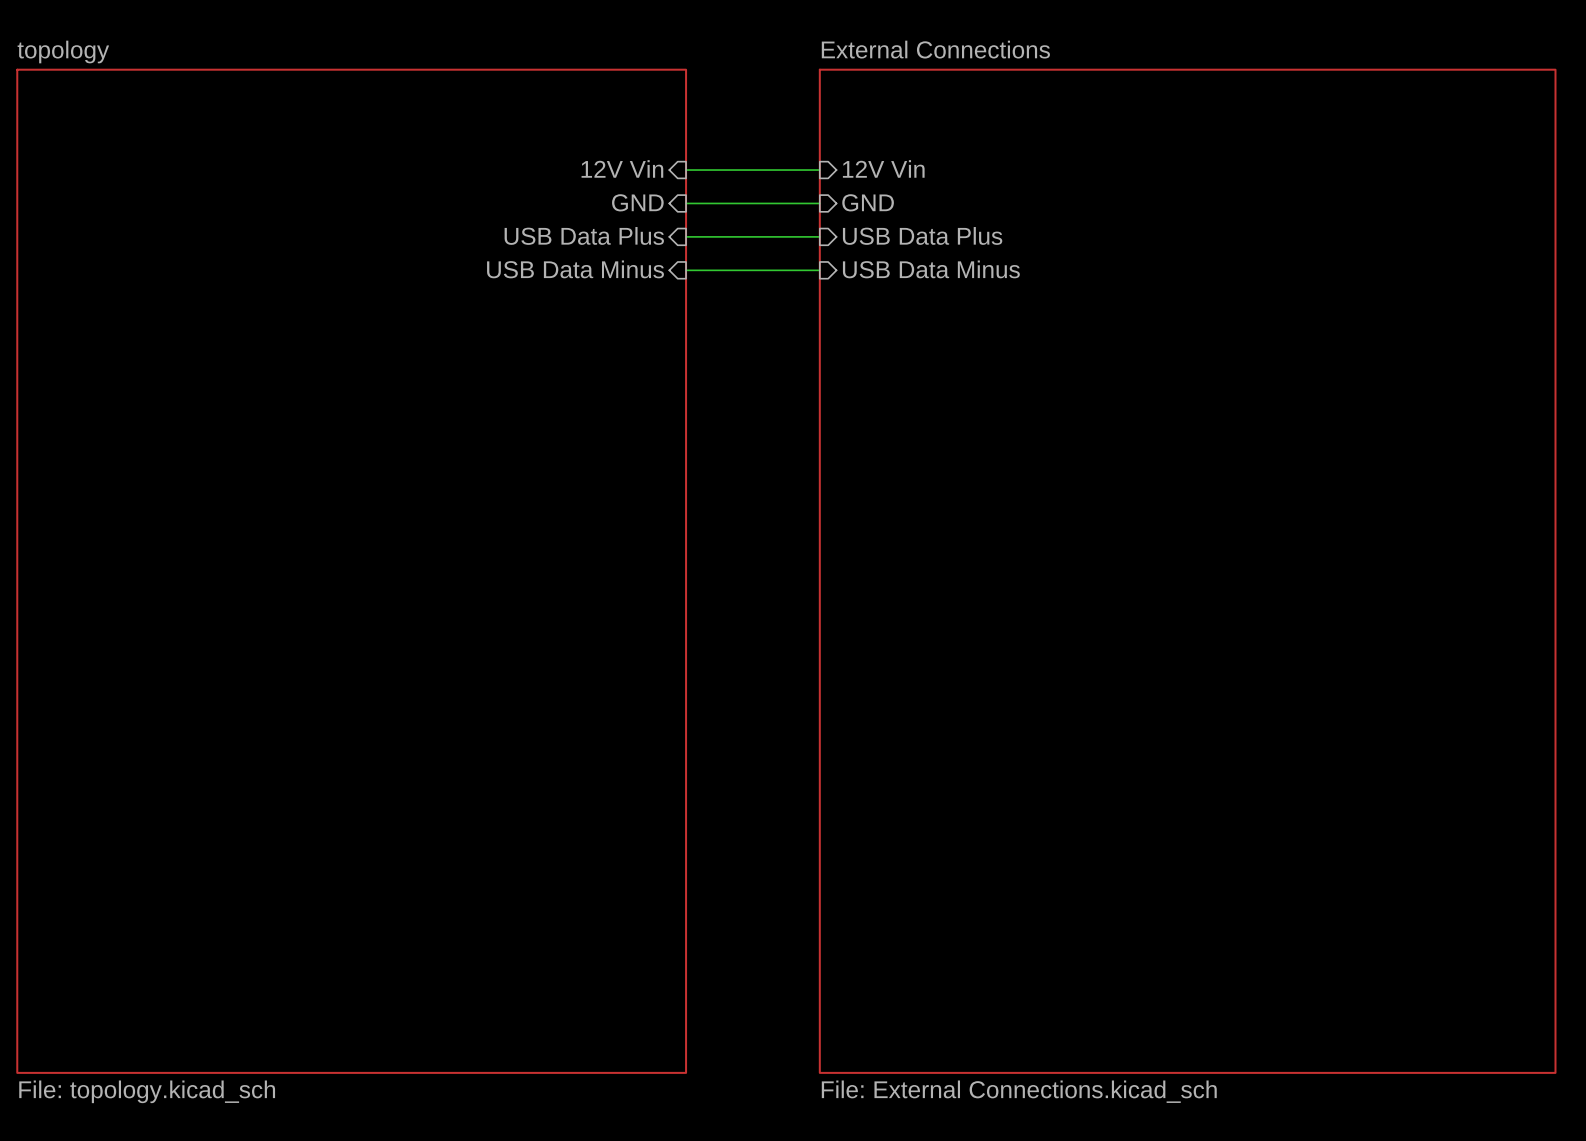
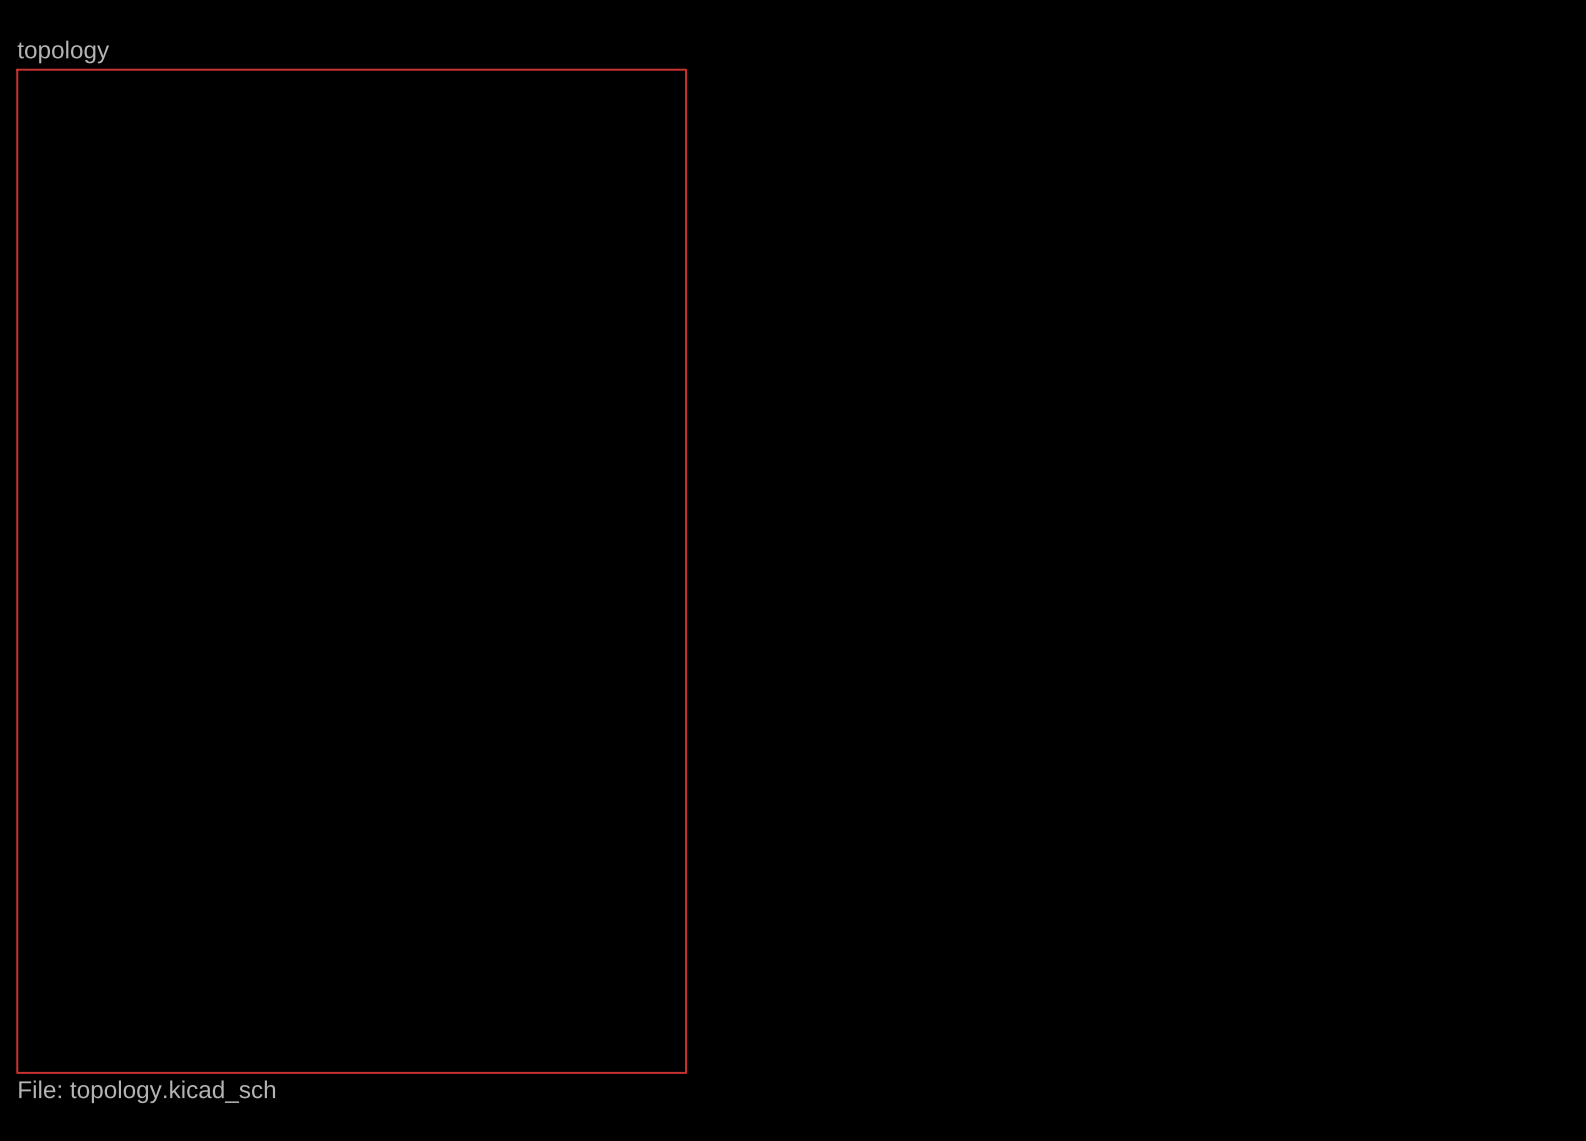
sheet pin: 12V Vin (622, 168) -> none
sheet pin: 12V Vin (883, 168) -> none
wire: (686, 170) (819, 170) -> none
sheet pin: GND (637, 202) -> none
sheet pin: GND (868, 202) -> none
wire: (686, 203) (819, 203) -> none
sheet pin: USB Data Plus (584, 235) -> none
sheet pin: USB Data Plus (922, 235) -> none
wire: (686, 236) (819, 236) -> none
sheet pin: USB Data Minus (575, 269) -> none
sheet pin: USB Data Minus (931, 269) -> none
wire: (686, 270) (819, 270) -> none
sheet External Connections: File: External Connections.kicad_sch (1187, 571) -> none

